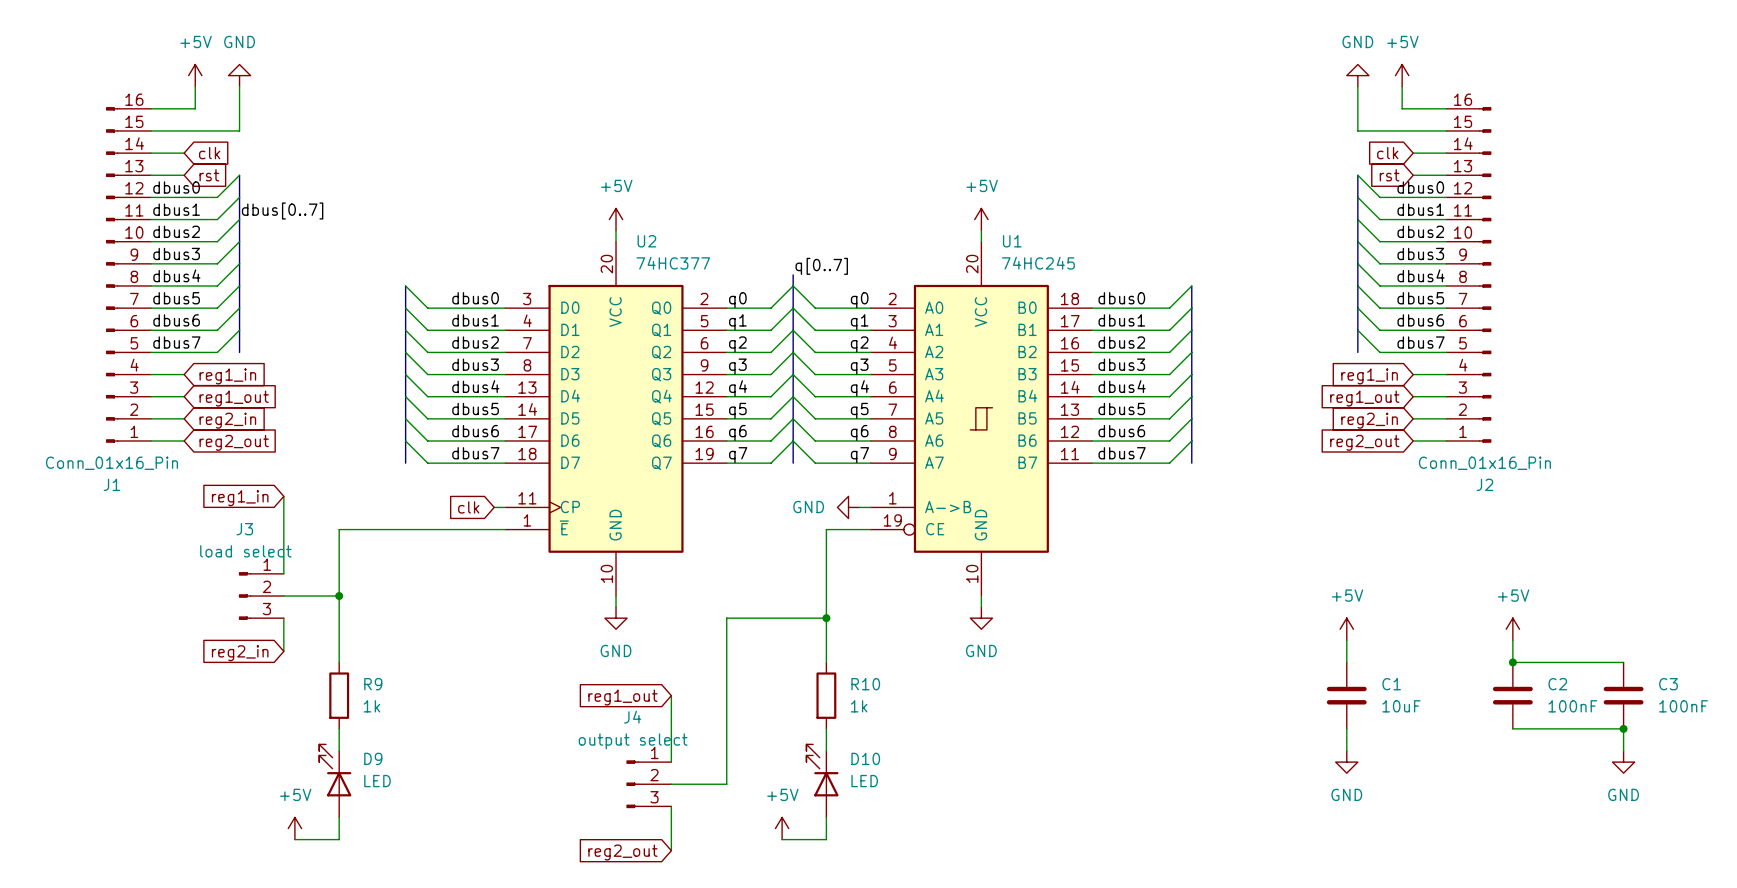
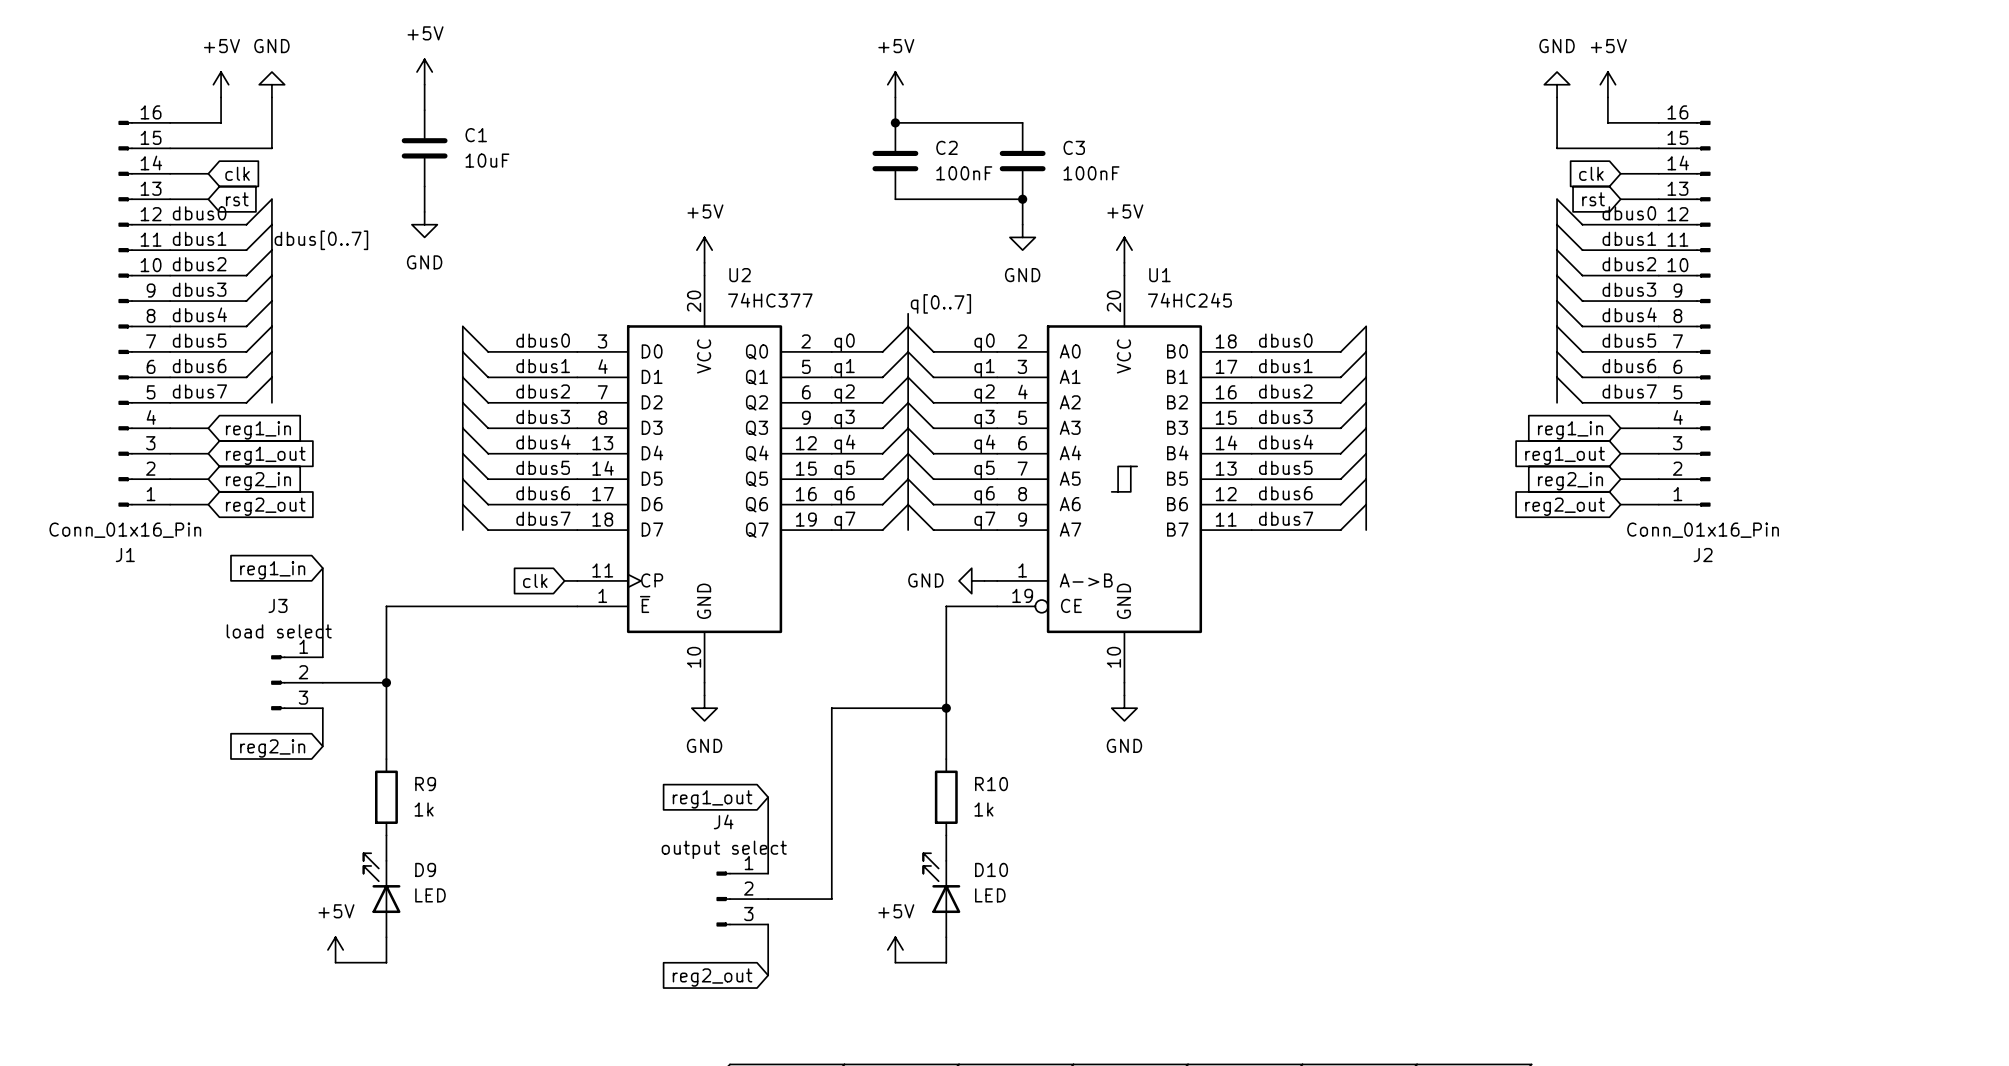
power symbol: none -> +5V (424, 72)
wire: none -> (424, 84) (424, 110)
power symbol: none -> +5V (895, 84)
wire: none -> (895, 97) (895, 122) (1022, 122)
junction: none -> (895, 122)
wire: none -> (424, 186) (424, 211)
wire: none -> (895, 199) (1022, 199) (1022, 224)
junction: none -> (1022, 199)
power symbol: none -> GND (424, 224)
power symbol: none -> GND (1022, 237)
power symbol: +5V (1346, 629) -> none
power symbol: +5V (1512, 629) -> none
wire: (1346, 640) (1346, 662) -> none
wire: (1512, 640) (1512, 662) (1623, 662) -> none
junction: (1512, 662) -> none
C1 position: (1346, 695) -> (424, 148)
C2 position: (1512, 695) -> (895, 161)
C3 position: (1623, 695) -> (1022, 161)
wire: (1346, 728) (1346, 751) -> none
wire: (1512, 728) (1623, 728) (1623, 751) -> none
junction: (1623, 728) -> none
power symbol: GND (1346, 762) -> none
power symbol: GND (1623, 762) -> none

